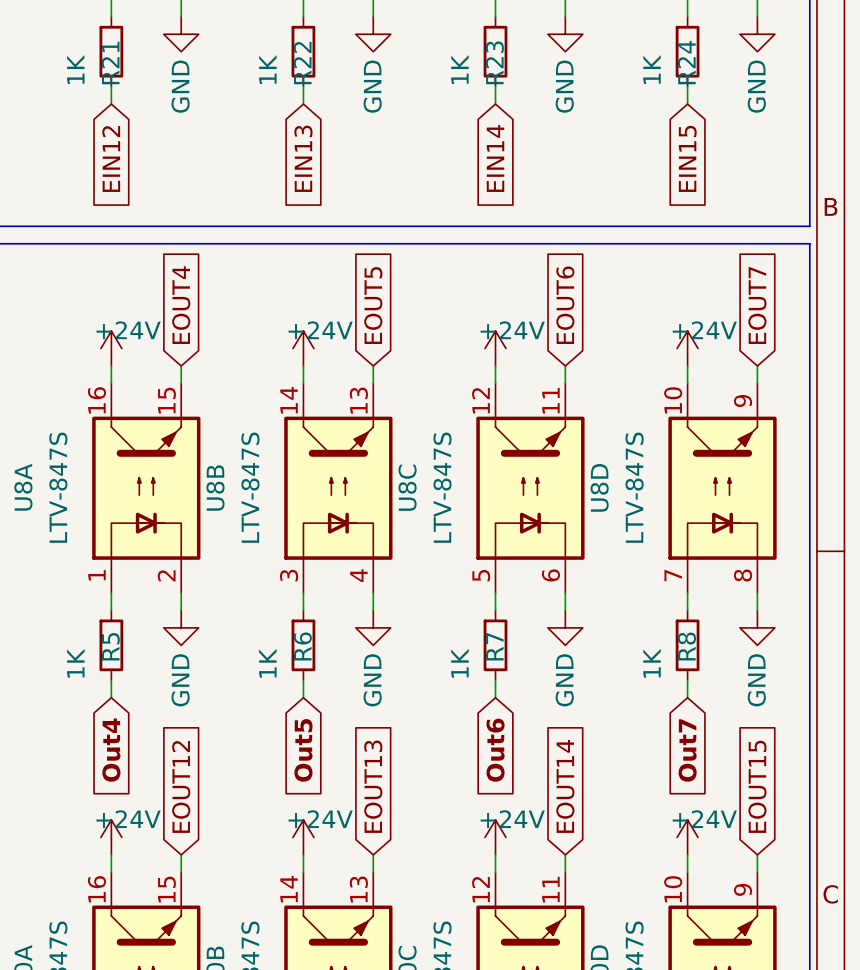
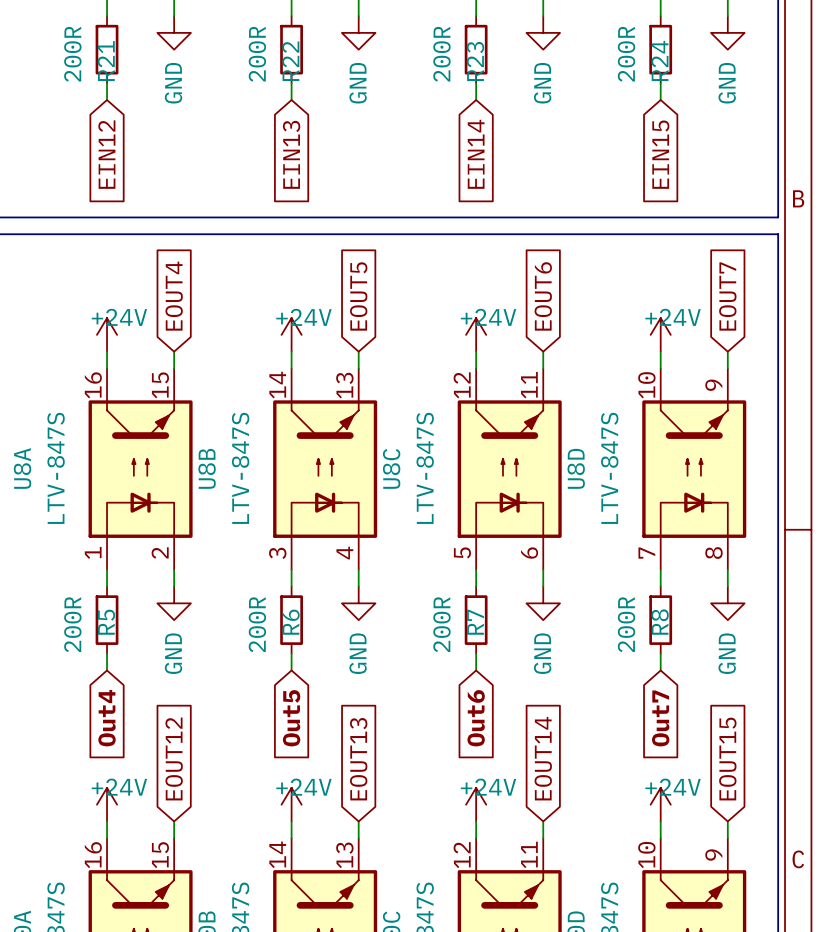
R21 value: 1K (75, 69) -> 200R (72, 54)
R22 value: 1K (267, 69) -> 200R (257, 54)
R23 value: 1K (459, 69) -> 200R (441, 54)
R24 value: 1K (652, 69) -> 200R (626, 54)
R5 value: 1K (75, 663) -> 200R (72, 624)
R6 value: 1K (267, 663) -> 200R (257, 624)
R7 value: 1K (459, 663) -> 200R (441, 624)
R8 value: 1K (652, 663) -> 200R (626, 624)

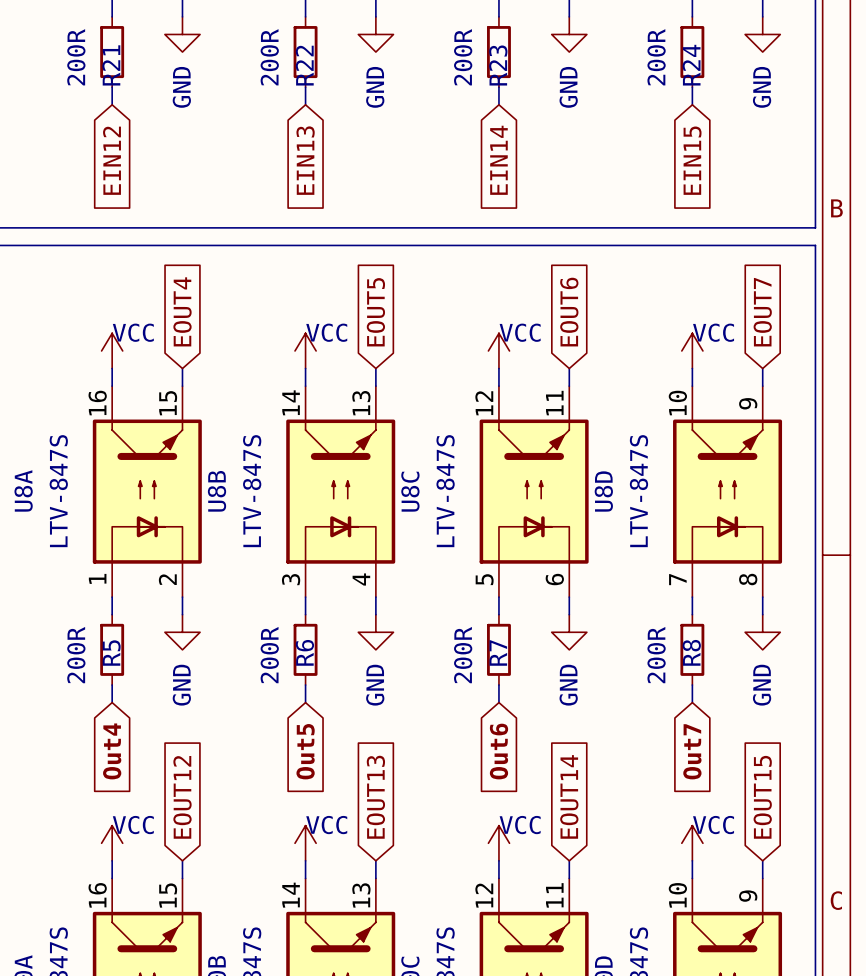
power symbol: +24V (107, 334) -> VCC (112, 350)
power symbol: +24V (291, 334) -> VCC (305, 350)
power symbol: +24V (476, 334) -> VCC (498, 350)
power symbol: +24V (660, 334) -> VCC (692, 350)
power symbol: +24V (107, 804) -> VCC (112, 843)
power symbol: +24V (291, 804) -> VCC (305, 843)
power symbol: +24V (476, 804) -> VCC (498, 843)
power symbol: +24V (660, 804) -> VCC (692, 843)

